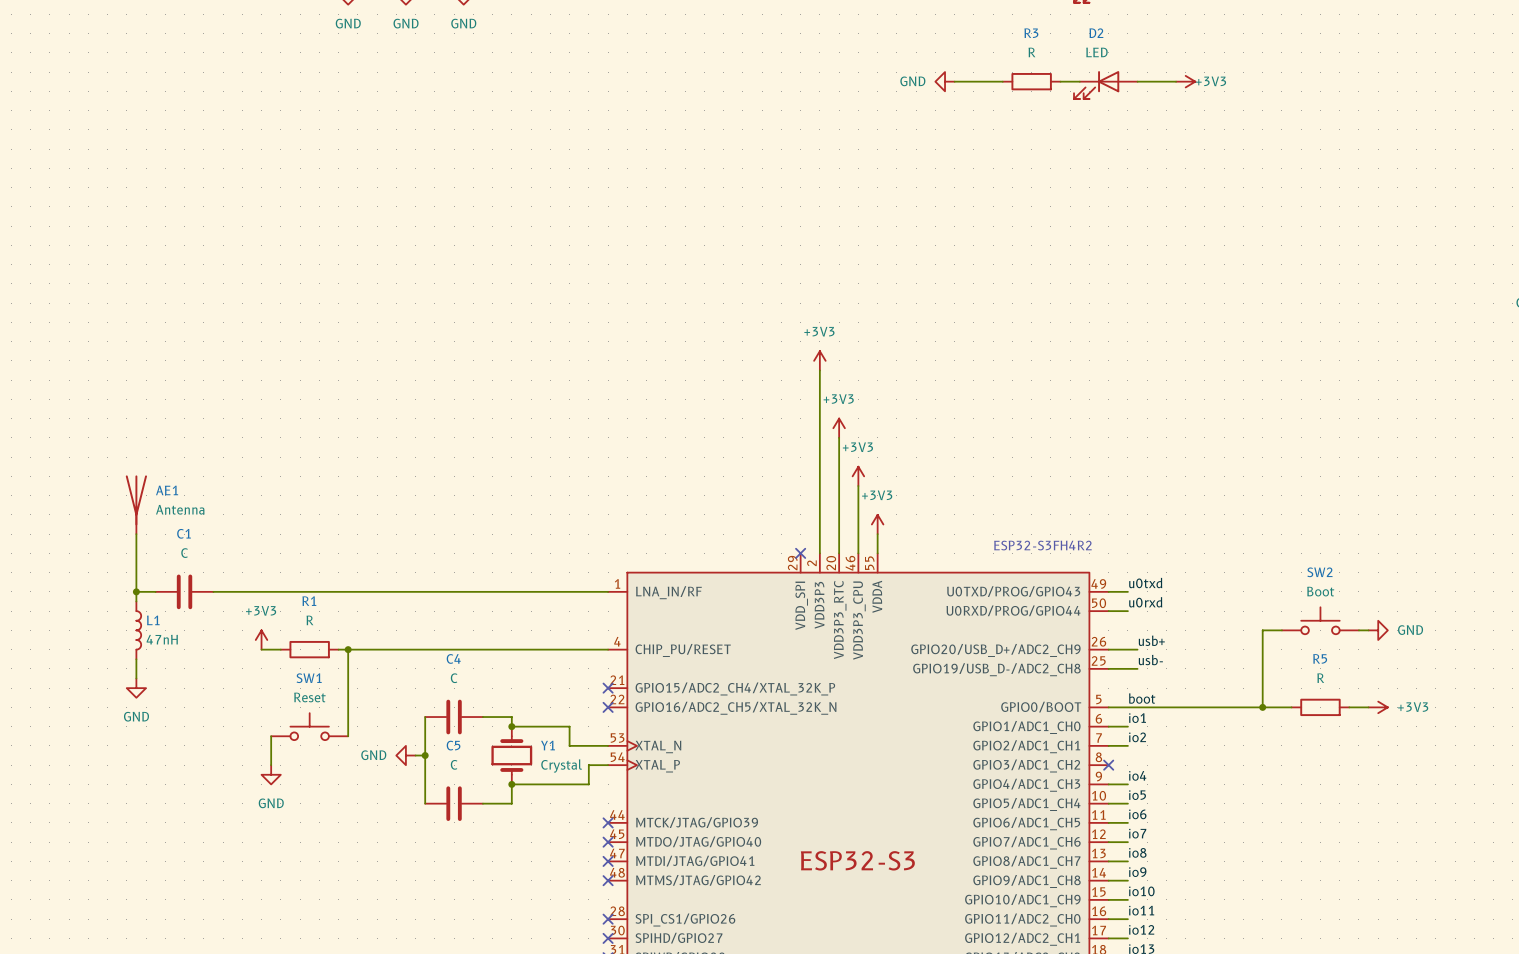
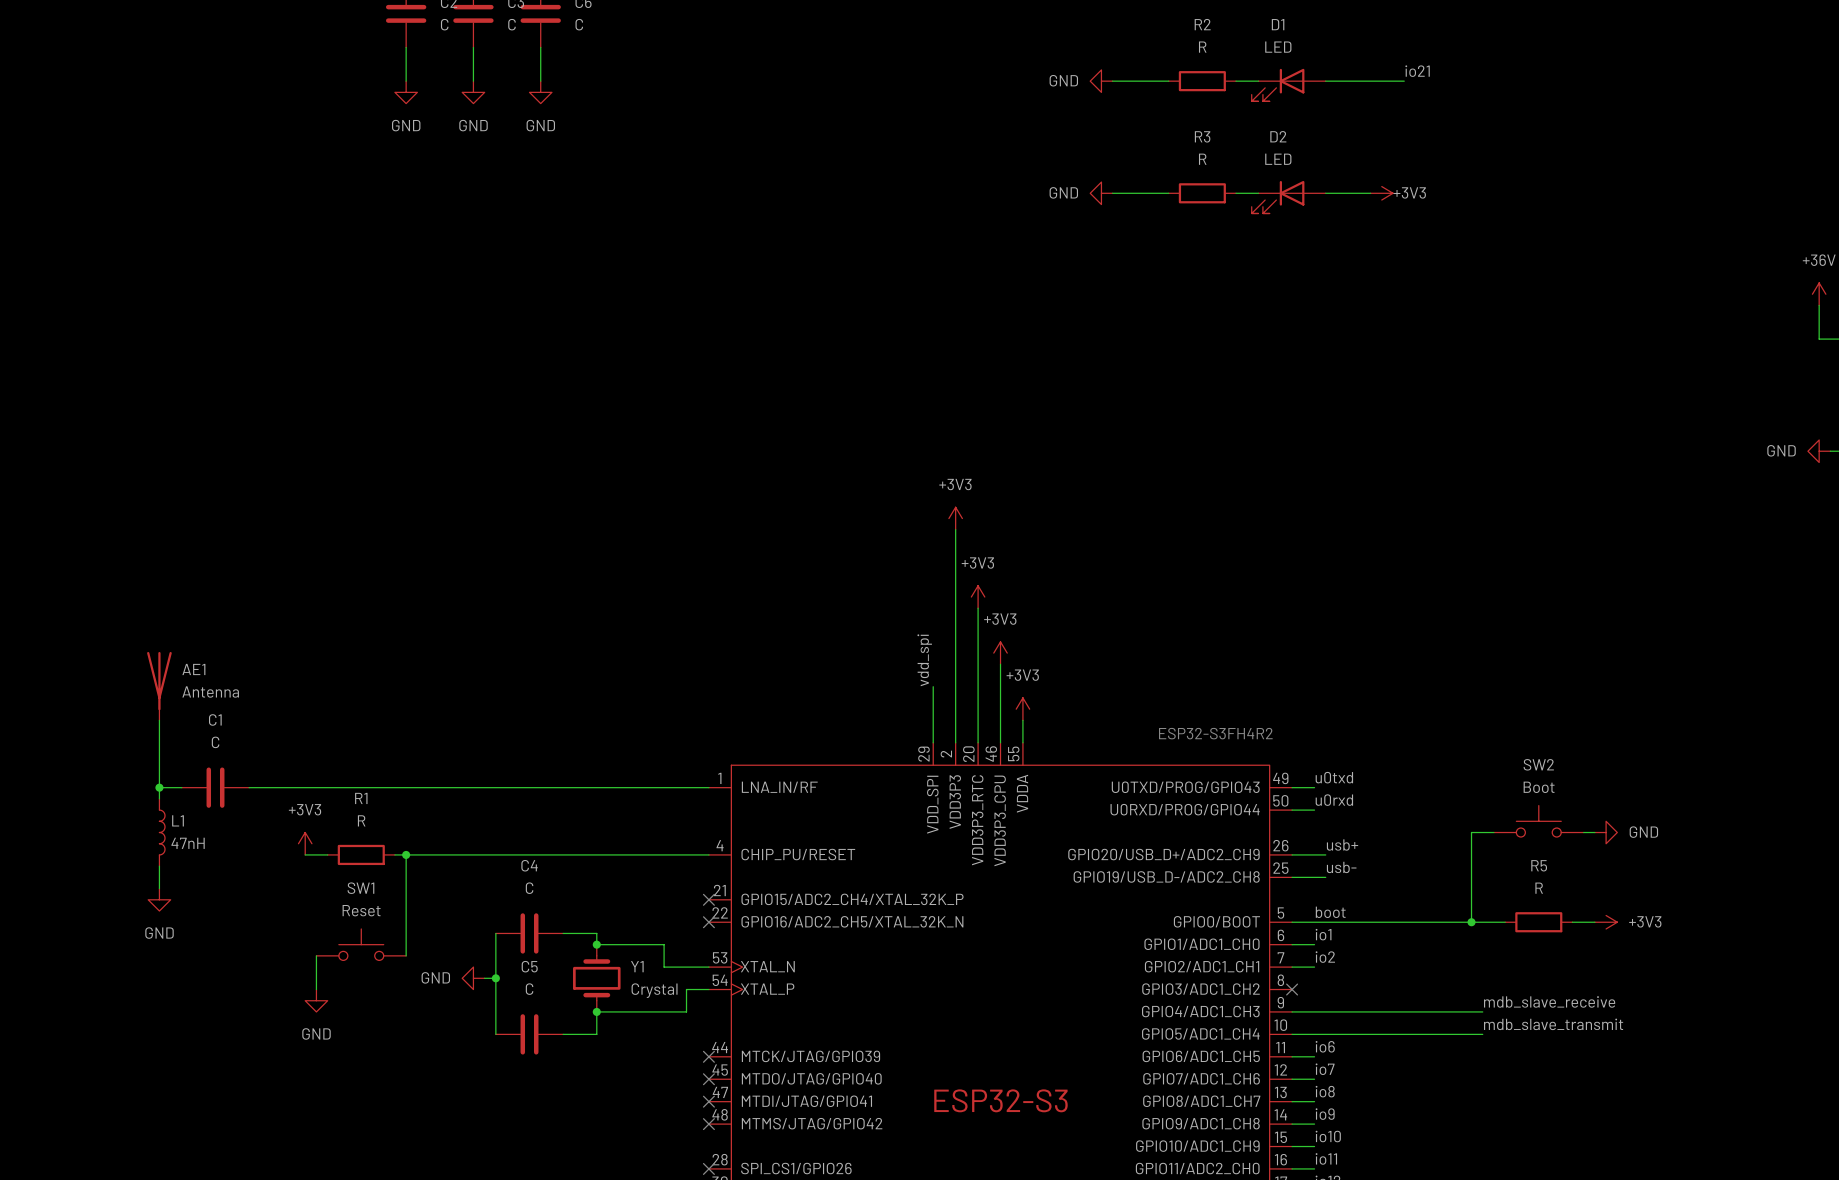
label: none -> vdd_spi (924, 660)
wire: none -> (933, 686) (933, 742)
no-connect mark: (800, 553) -> none
label: io4 (1137, 775) -> none
label: none -> mdb_slave_receive (1549, 1001)
wire: none -> (1314, 1011) (1482, 1011)
label: io5 (1137, 795) -> none
label: none -> mdb_slave_transmit (1553, 1024)
wire: none -> (1314, 1034) (1482, 1034)

